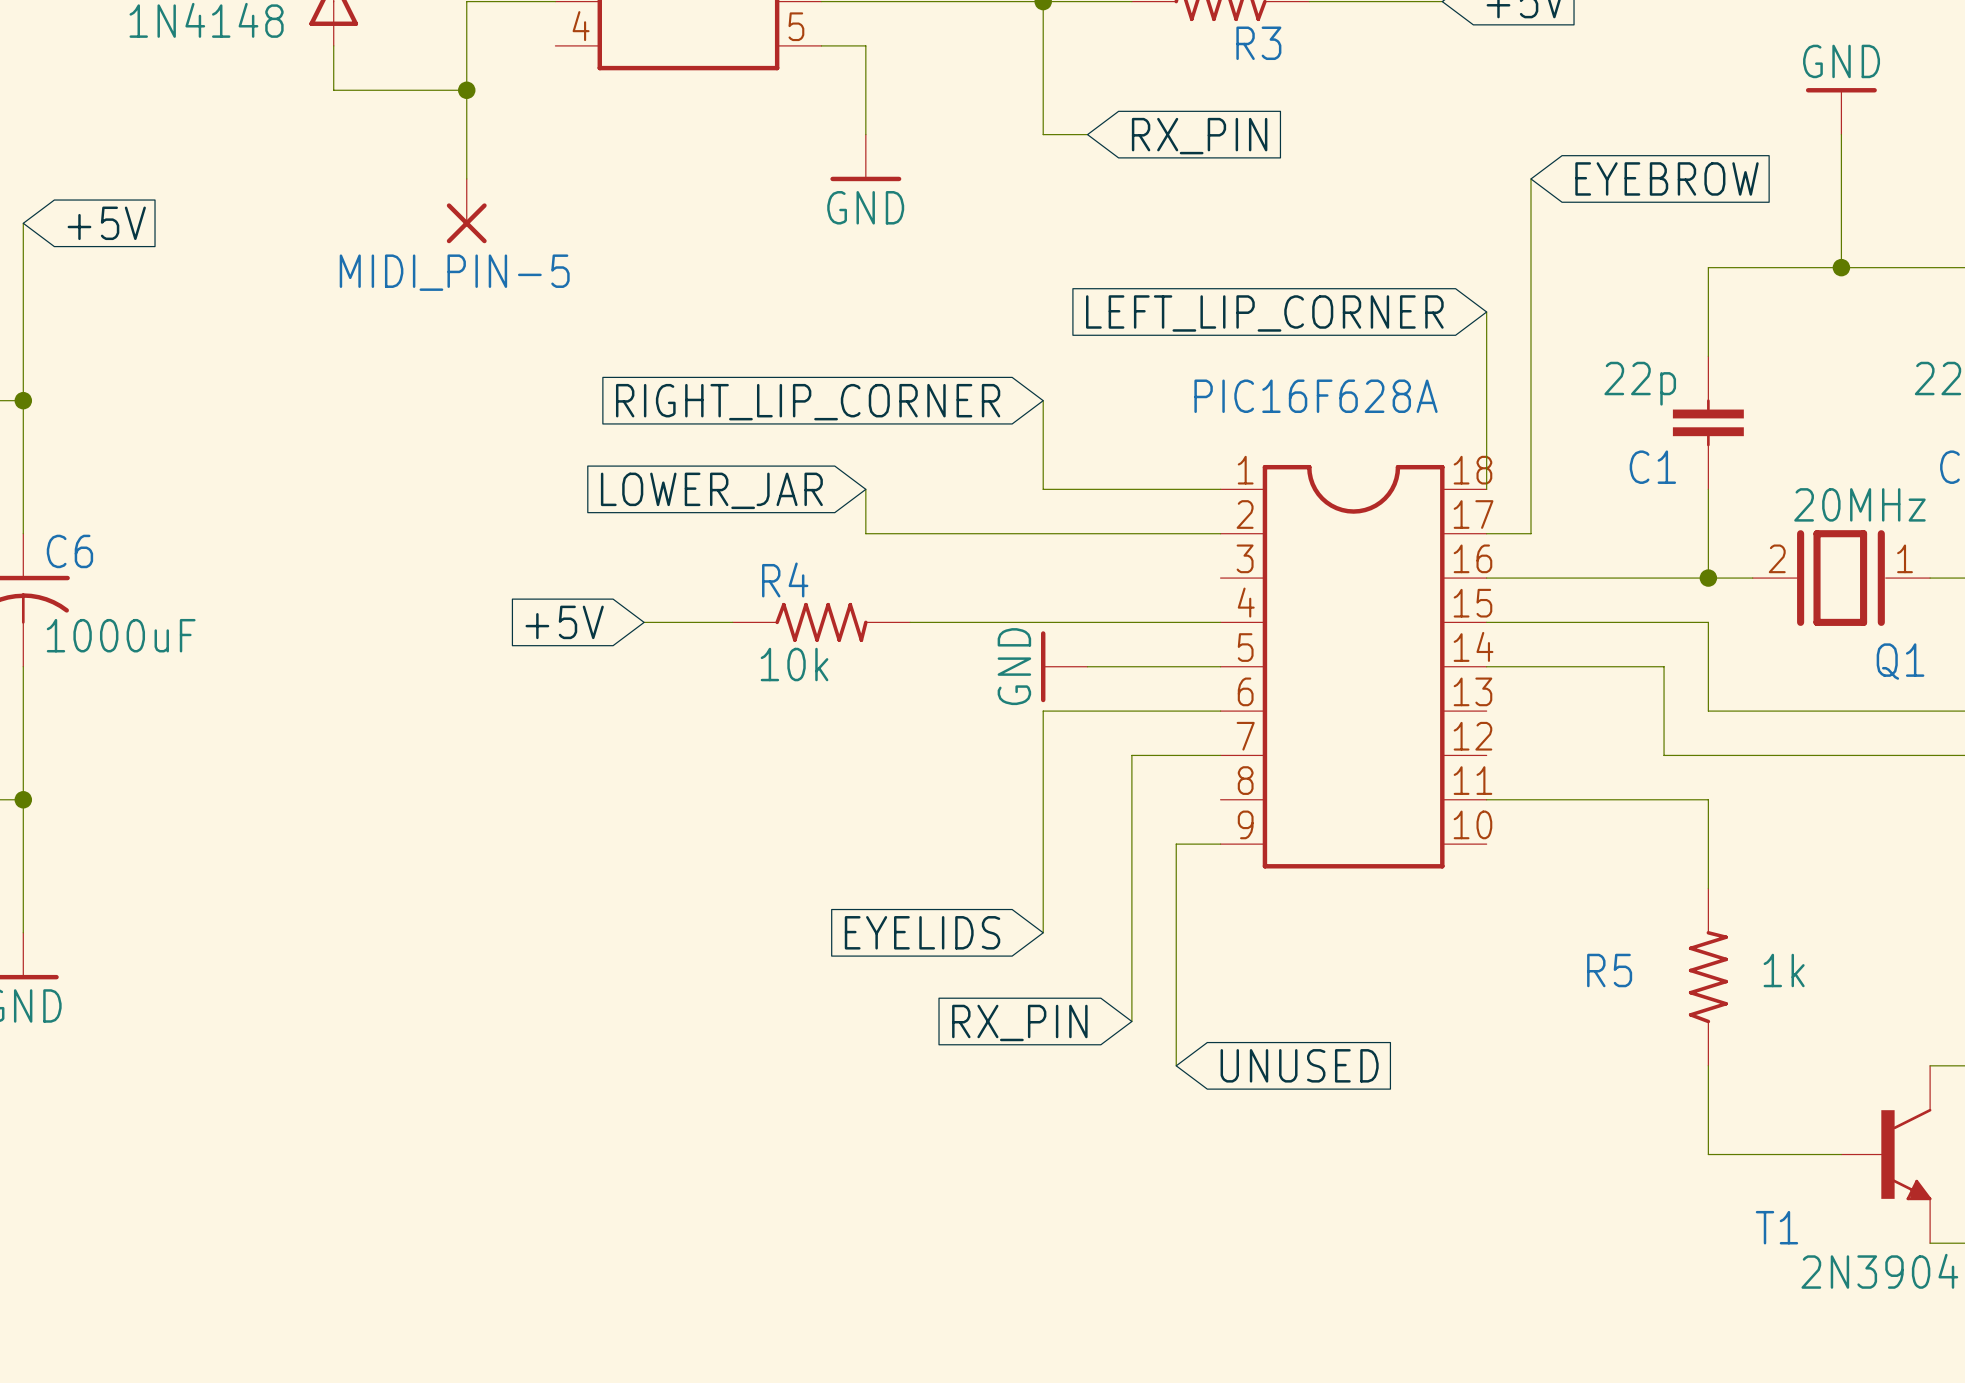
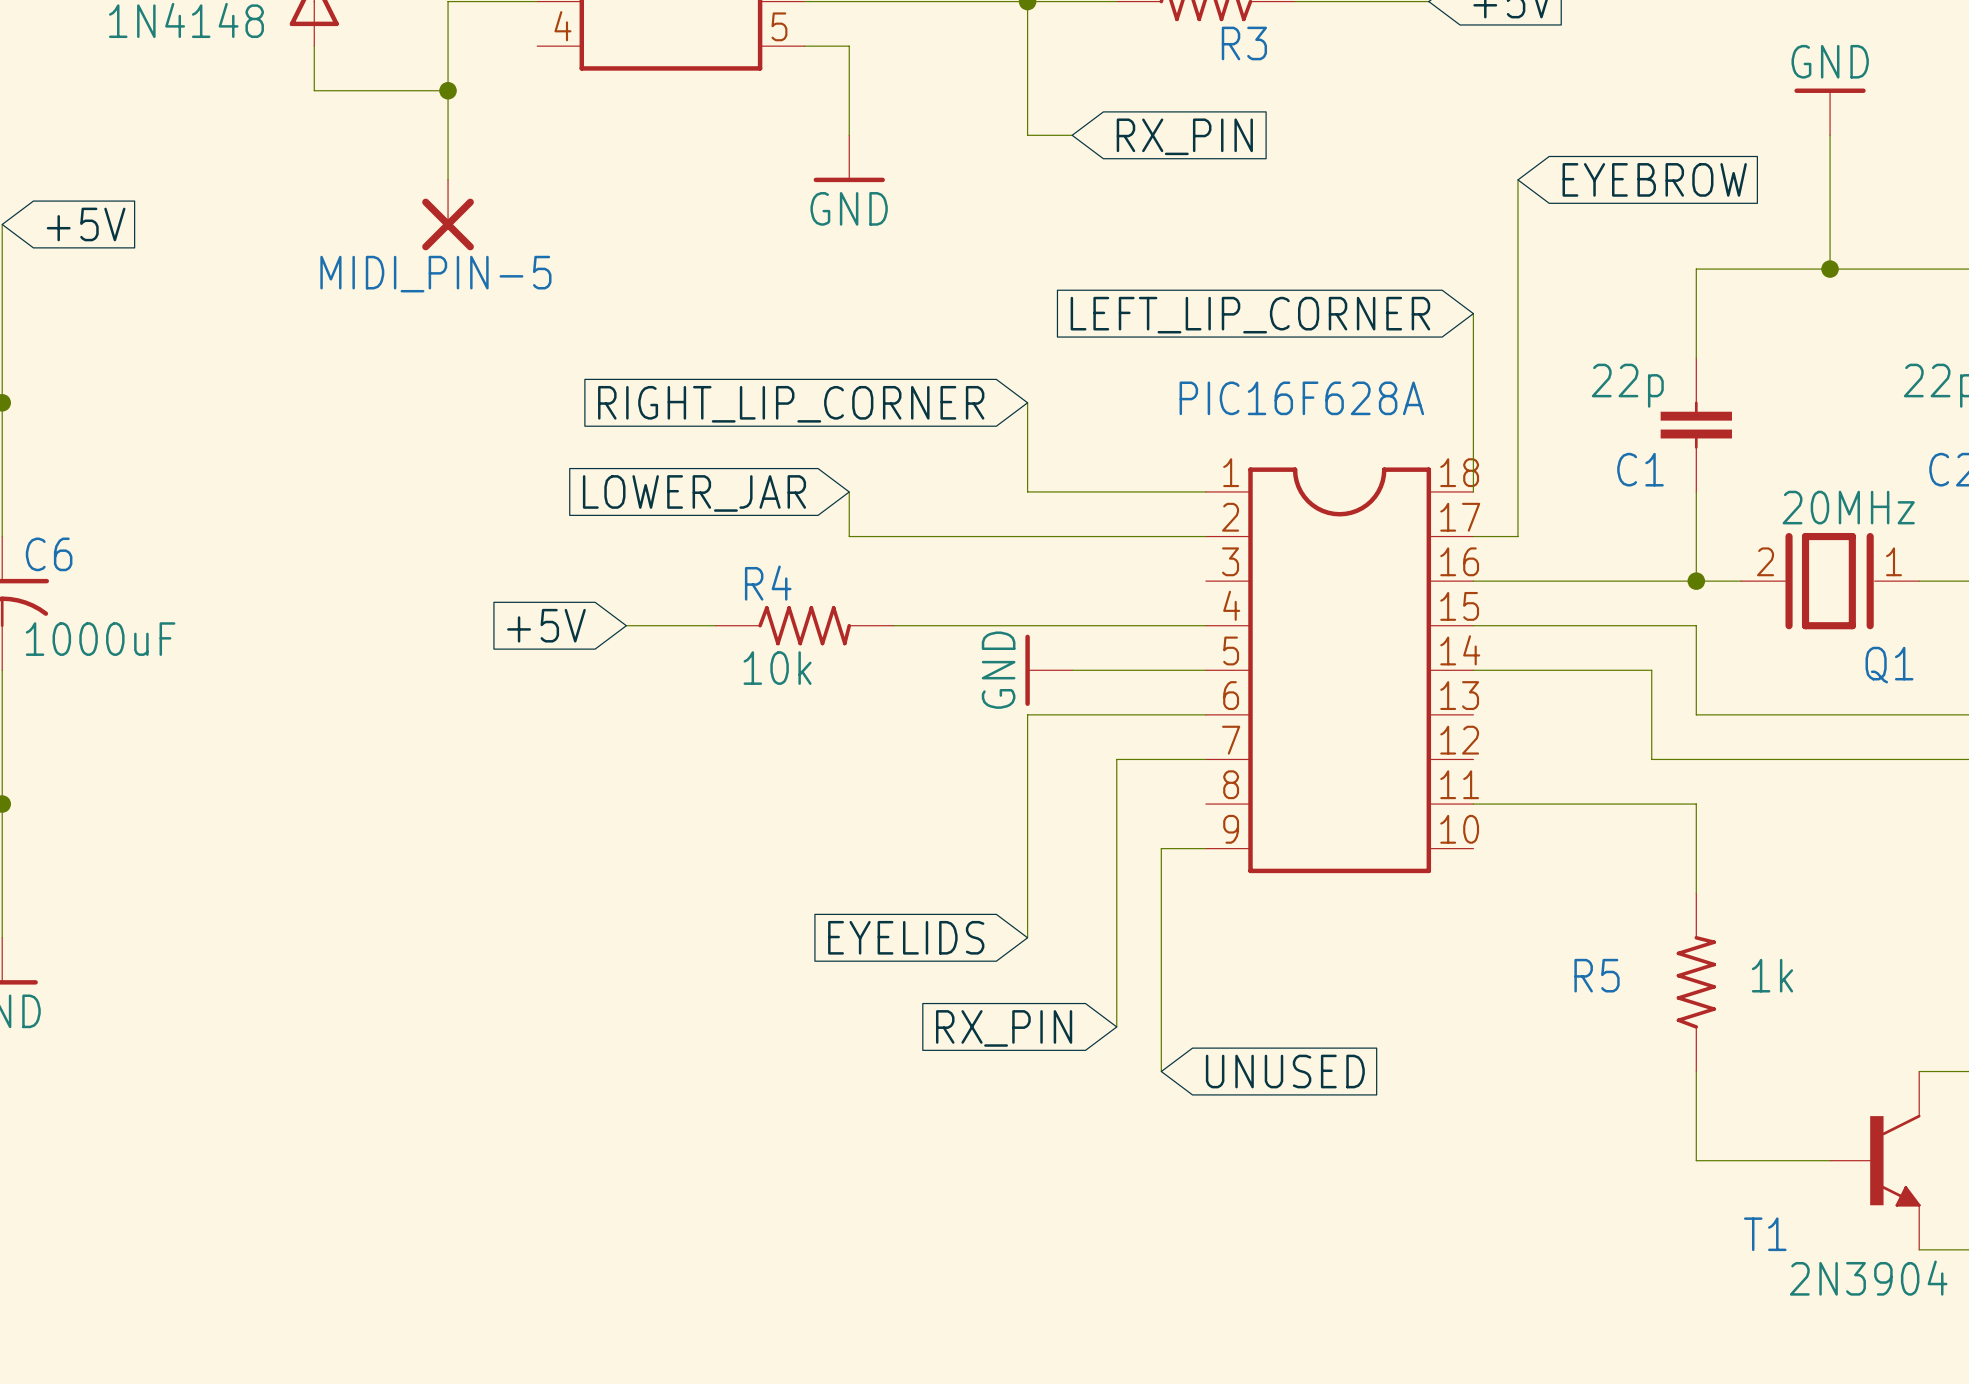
MIDI_PIN-5 symbol: [446, 178, 487, 244] -> [422, 179, 474, 251]

